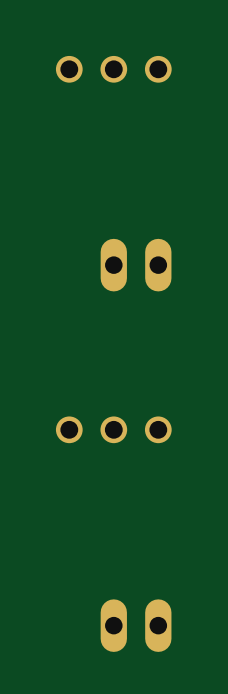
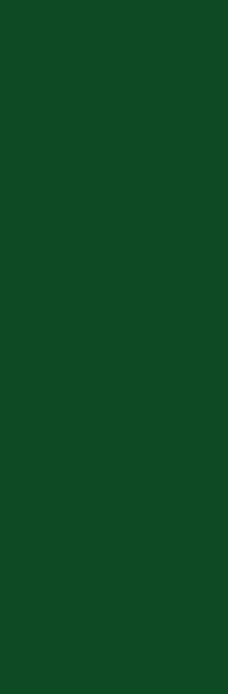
part: (113, 69) -> none
part: (136, 265) -> none
part: (113, 429) -> none
part: (136, 625) -> none

